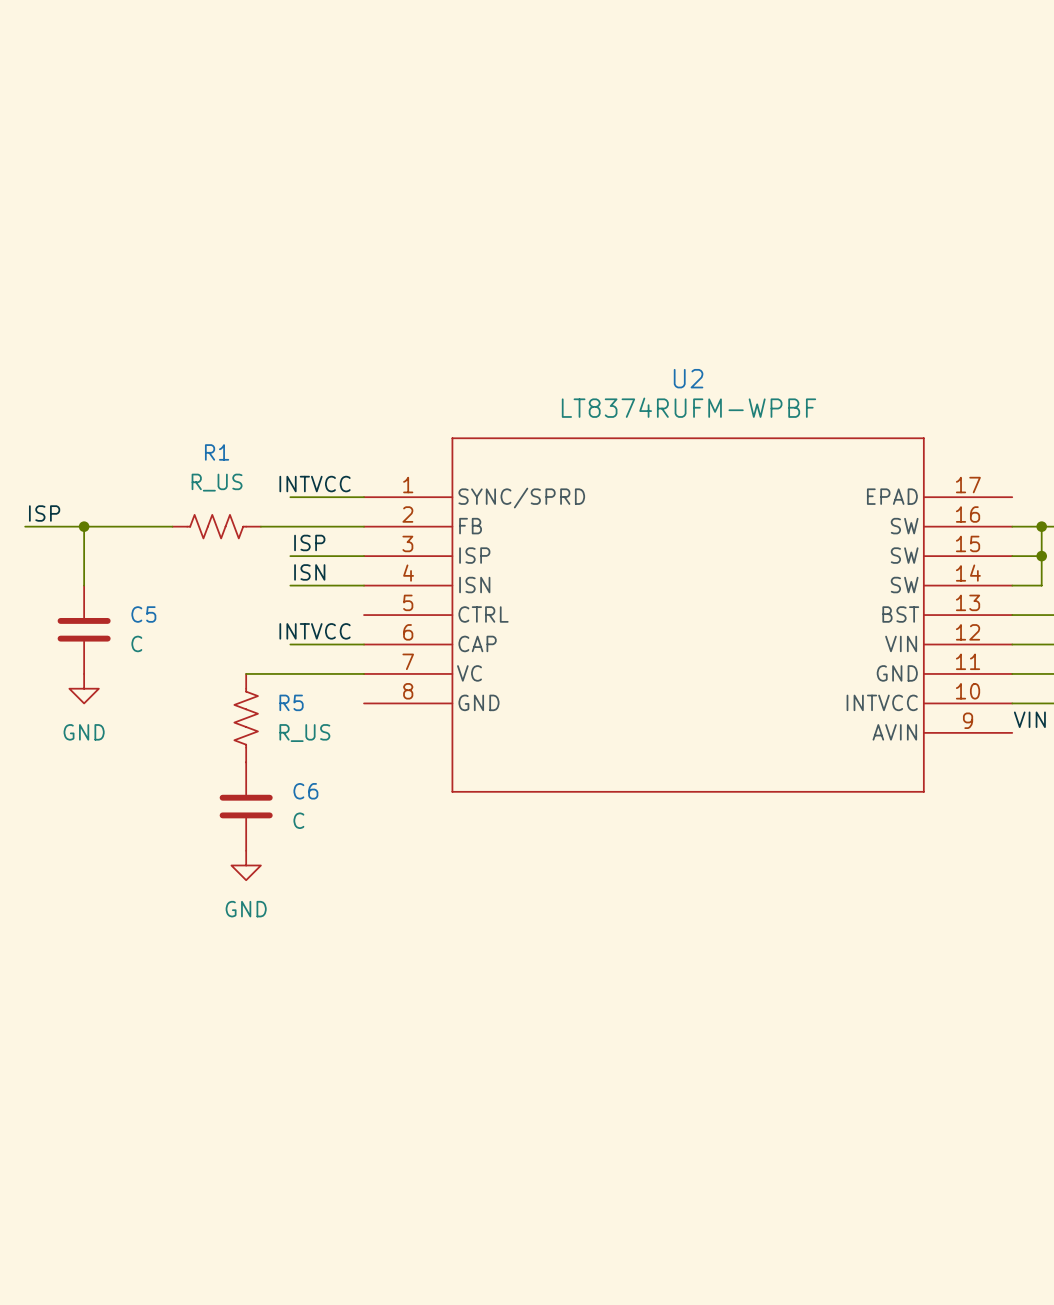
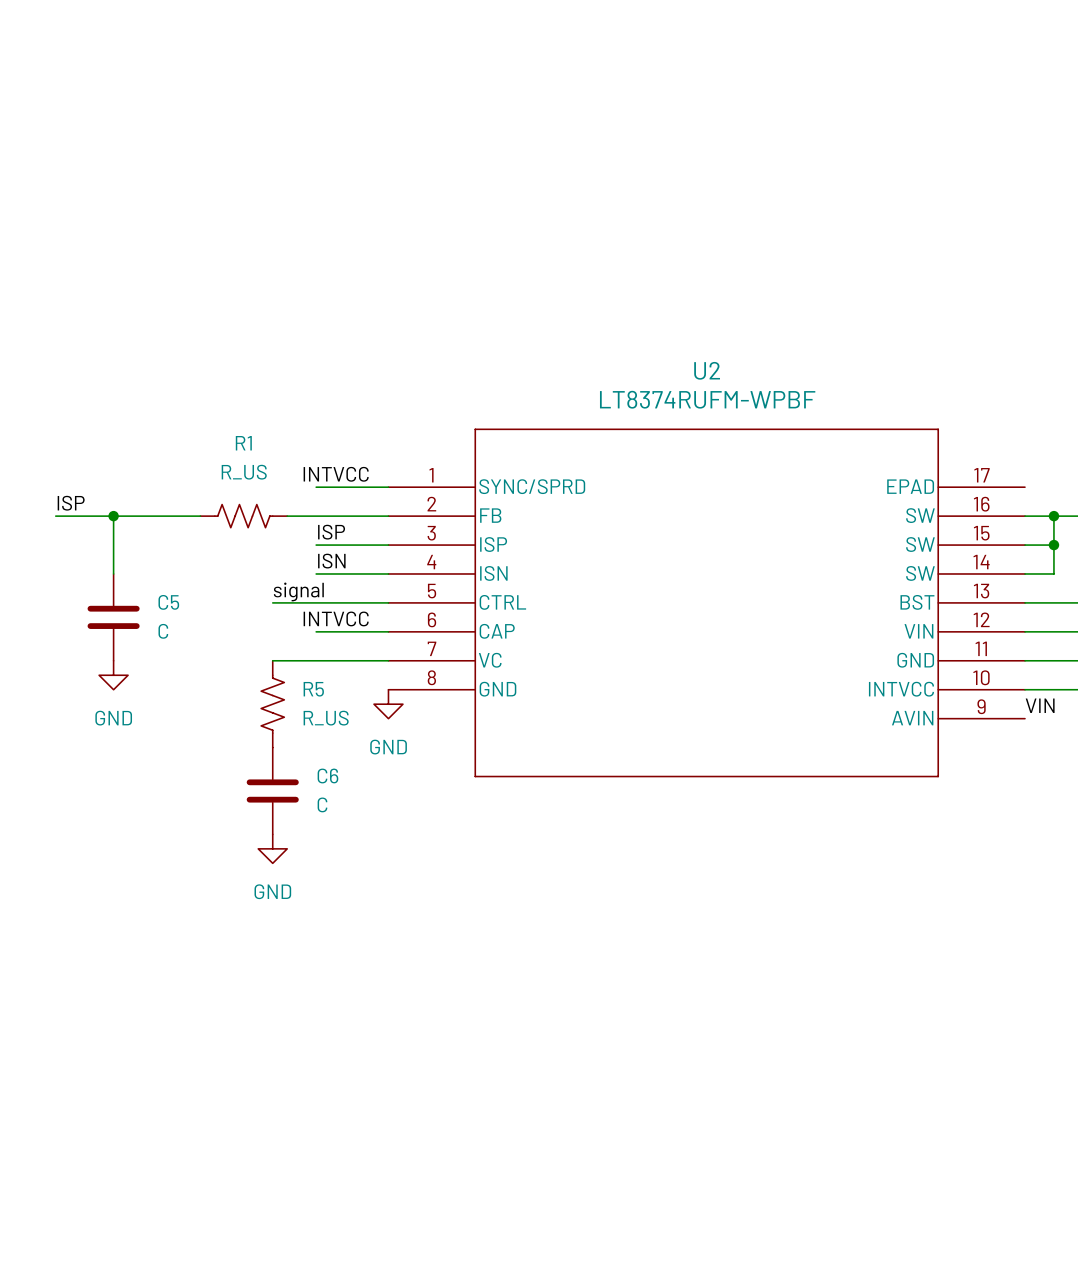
label: none -> signal (298, 591)
wire: none -> (272, 602) (388, 602)
power symbol: none -> GND (388, 704)

